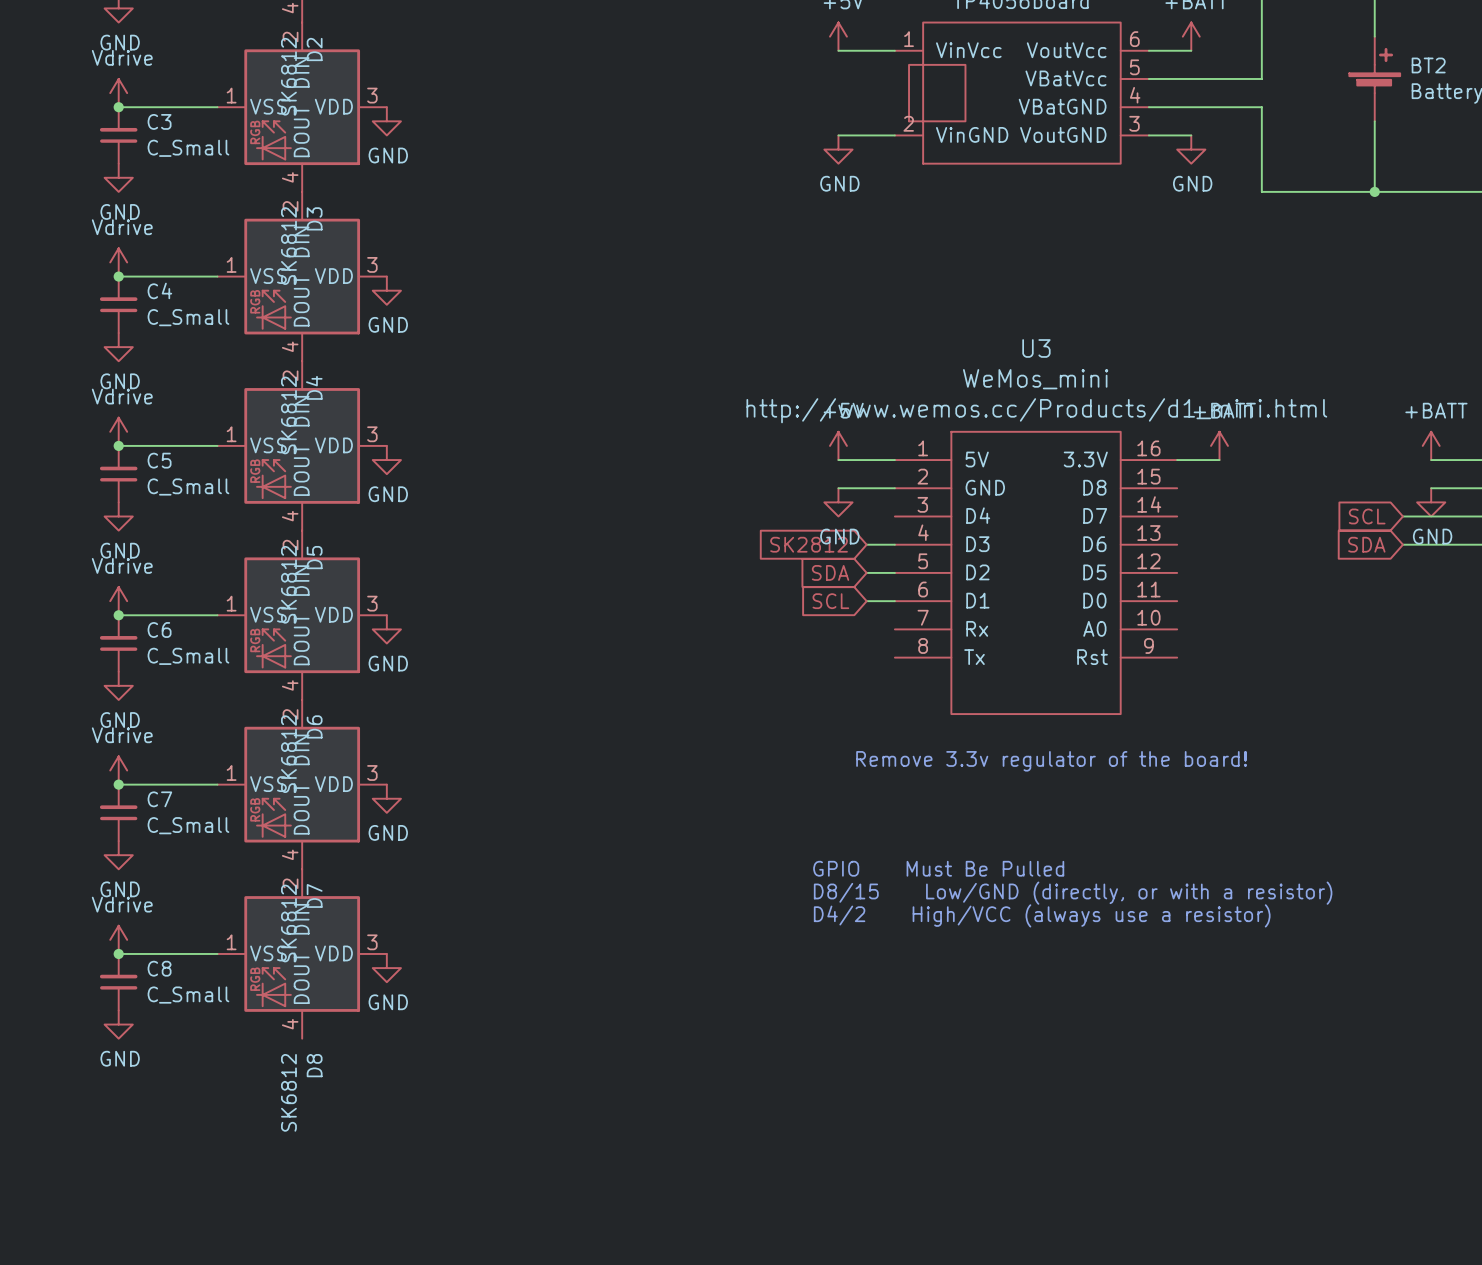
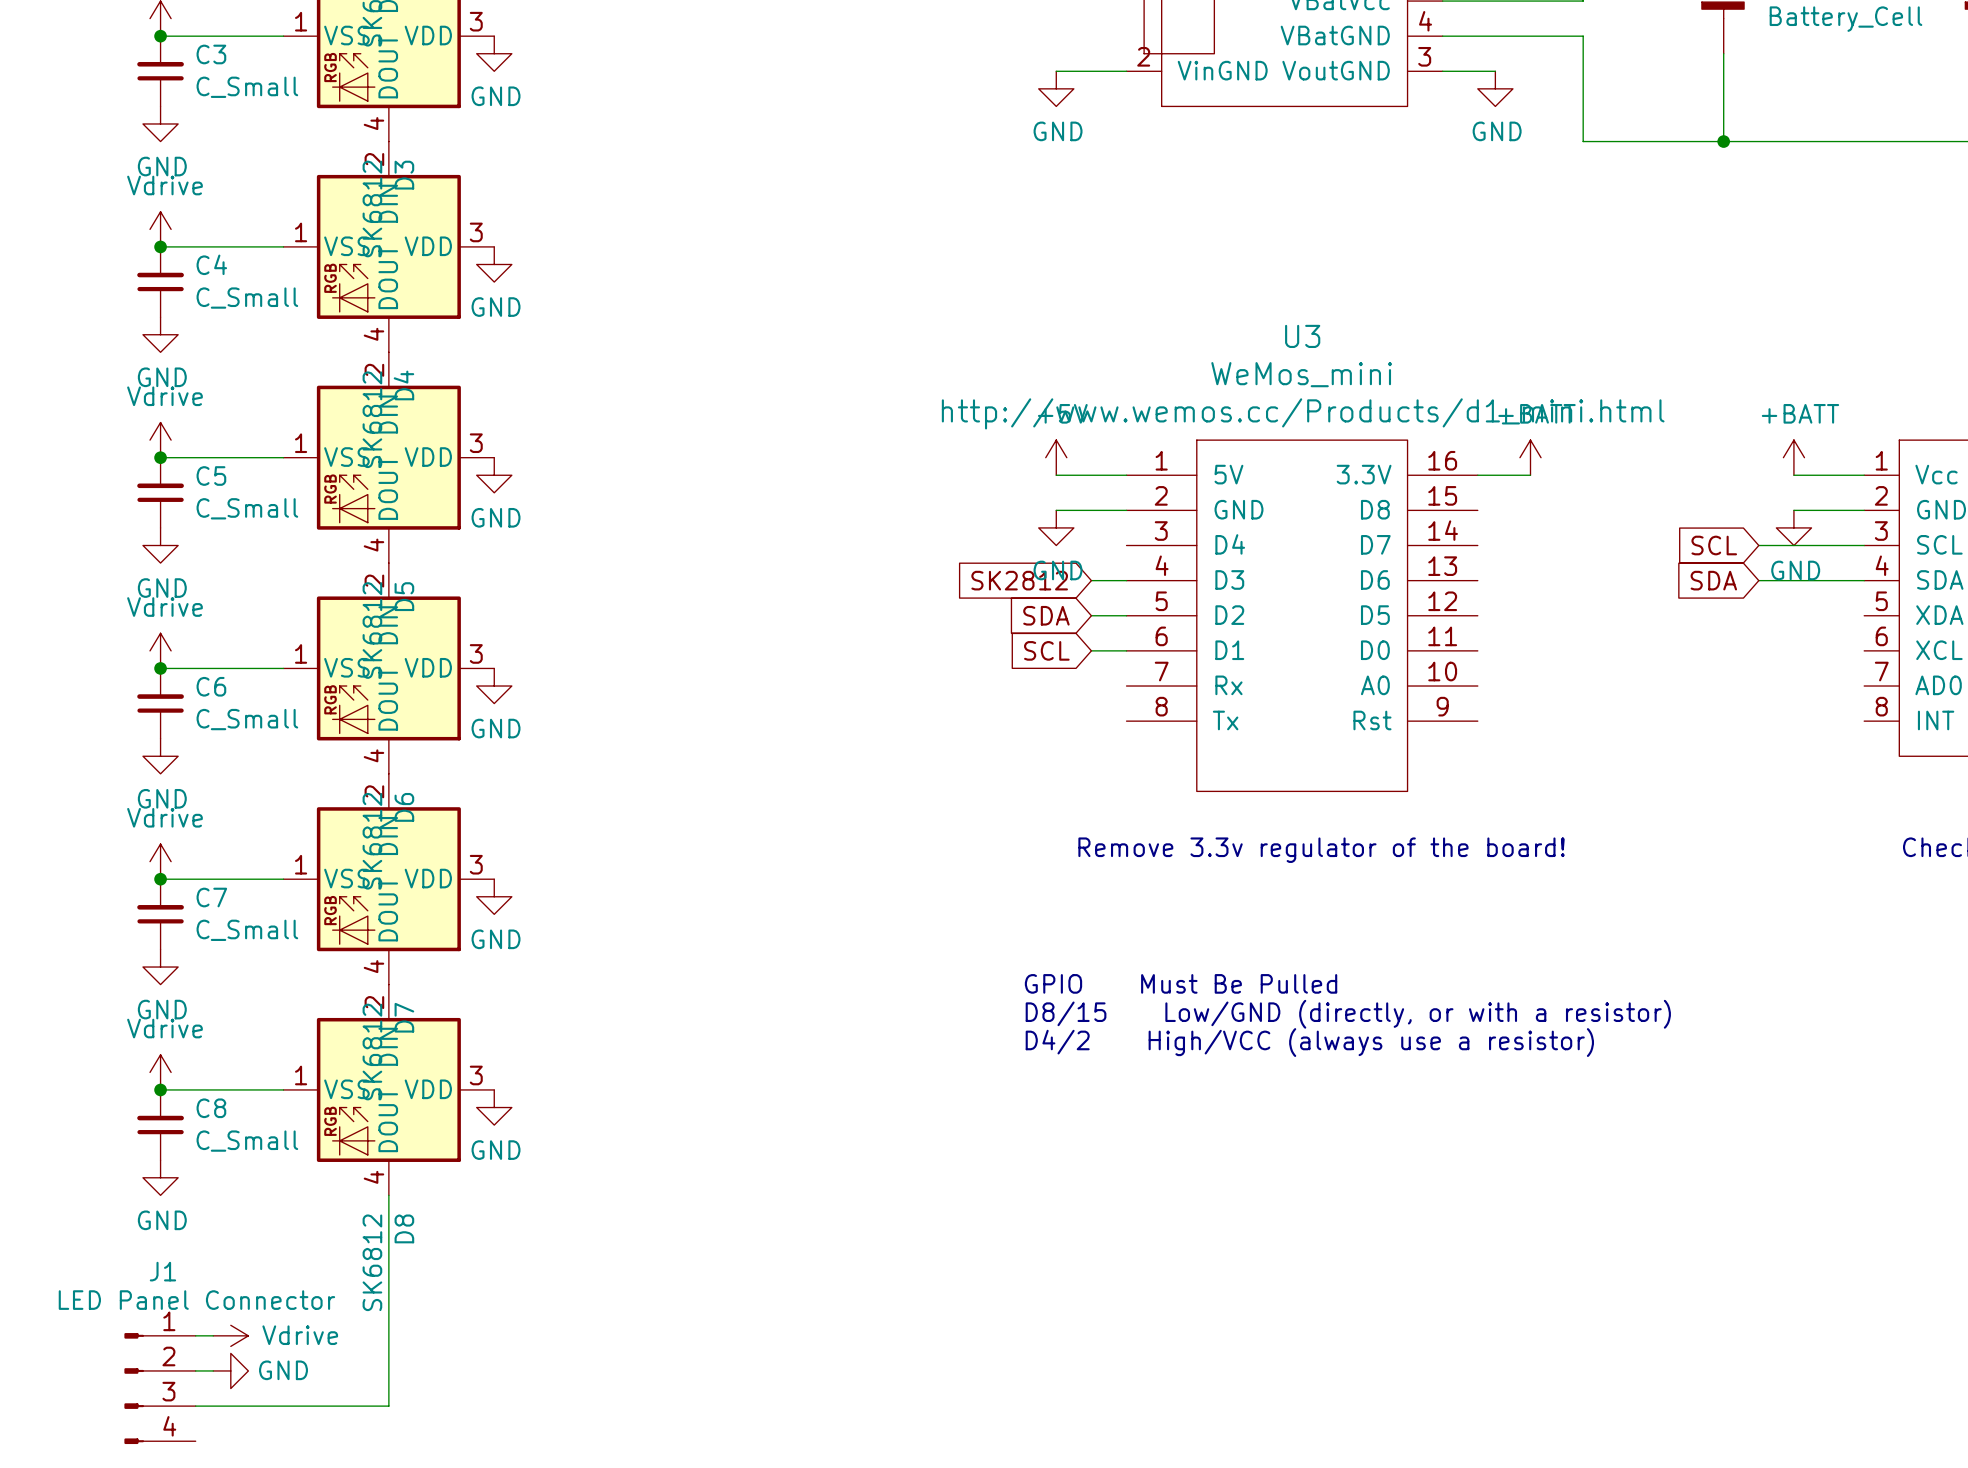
wire: none -> (388, 1195) (388, 1406) (195, 1406)
wire: none -> (195, 1335) (213, 1335)
power symbol: none -> Vdrive (230, 1335)
wire: none -> (195, 1370) (213, 1370)
power symbol: none -> GND (230, 1370)
J1: none -> LED Panel Connector (160, 1388)

